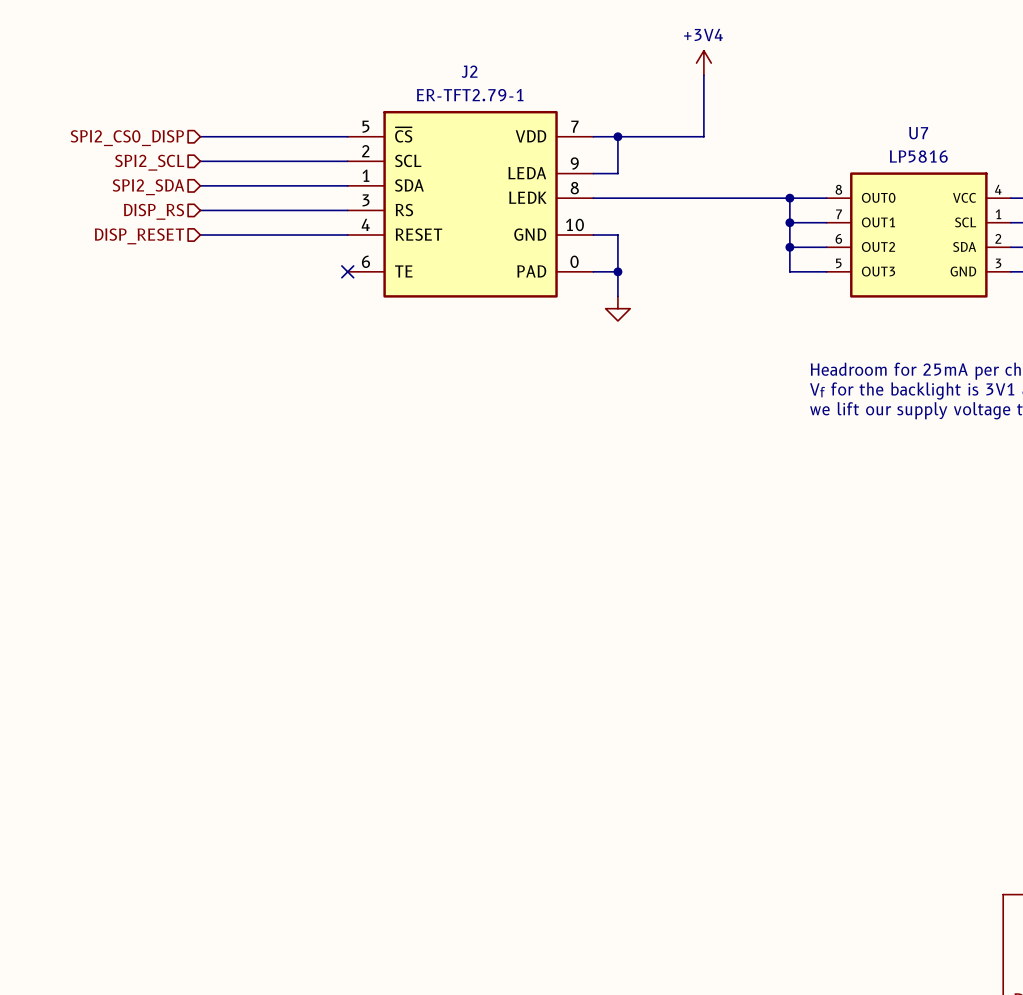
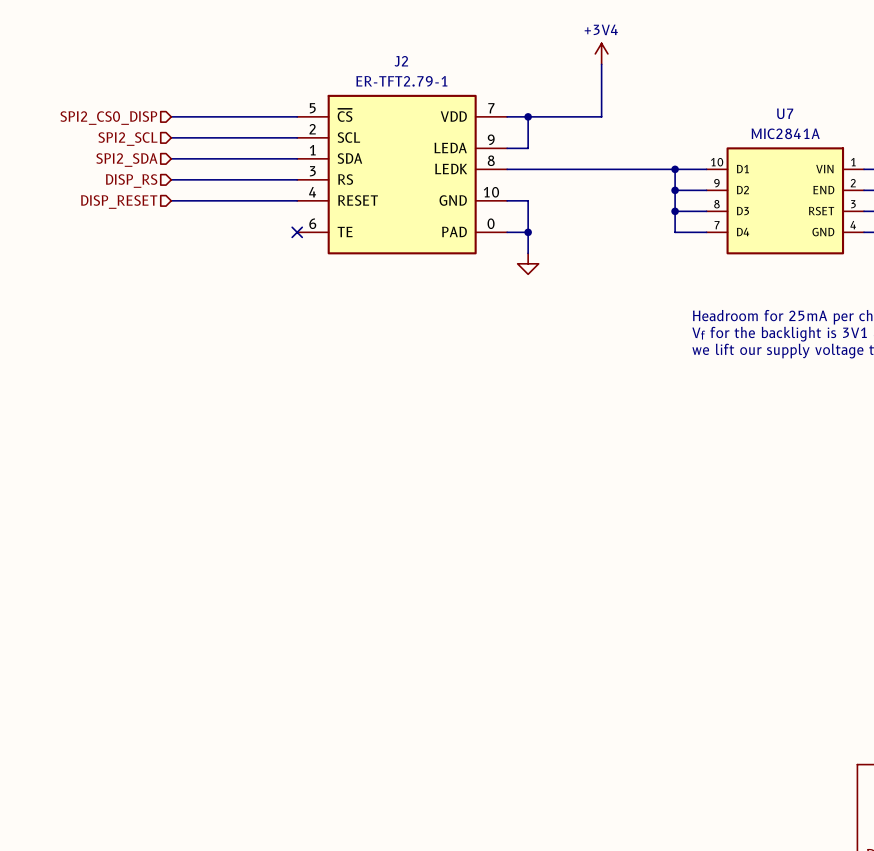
U7 value: LP5816 (918, 156) -> MIC2841A (785, 133)
U7 symbol: [826, 172, 1011, 298] -> [706, 147, 865, 255]

